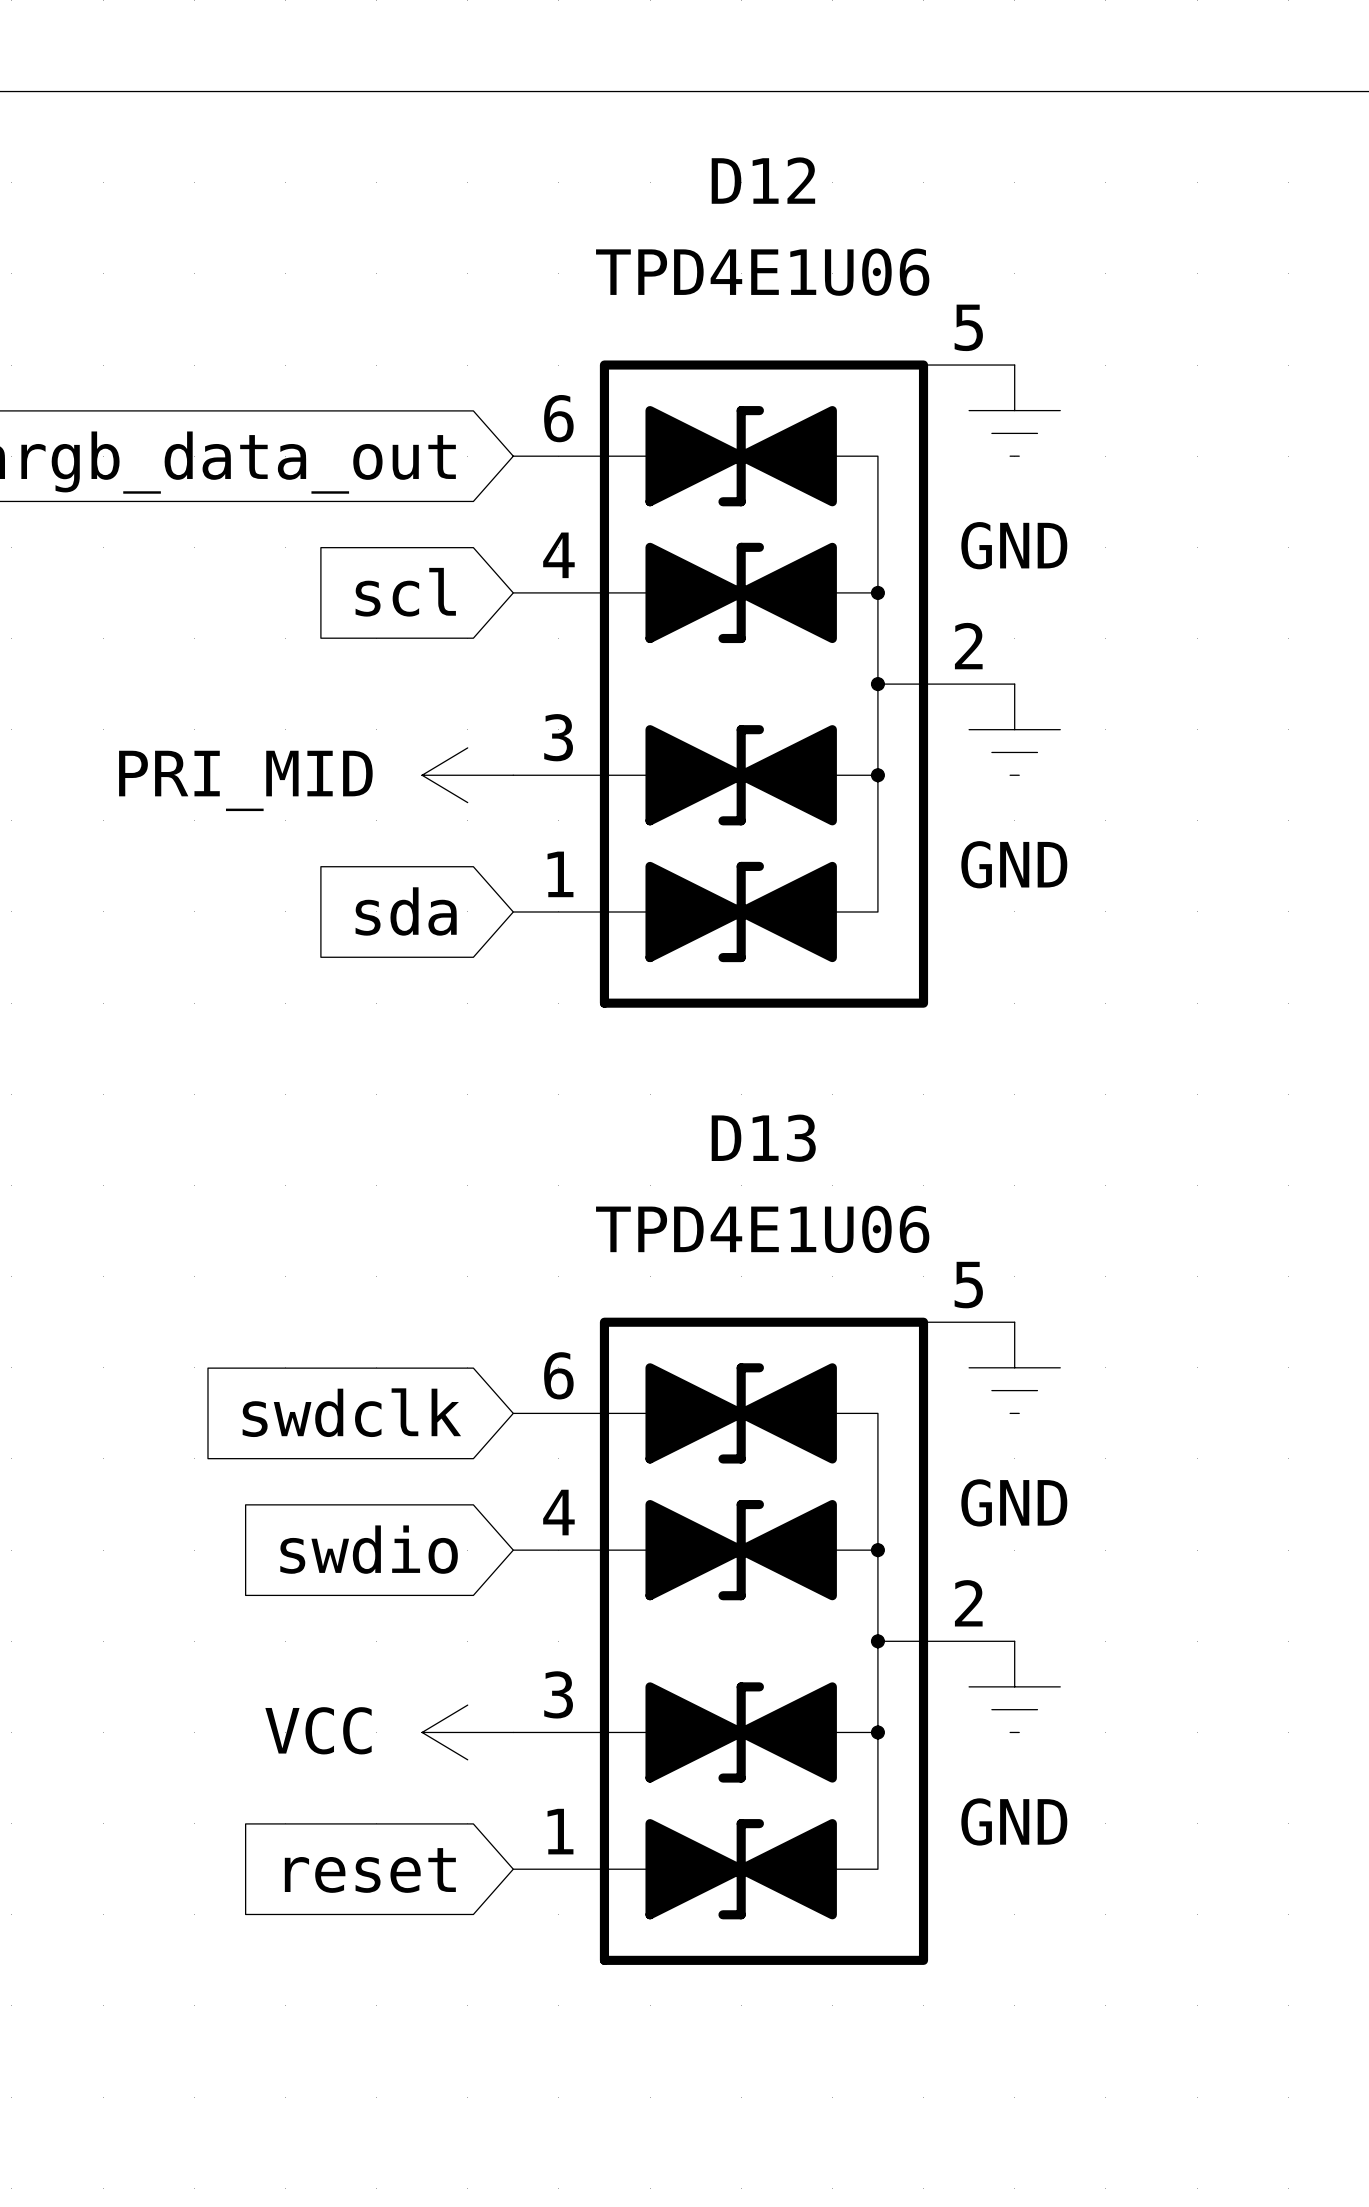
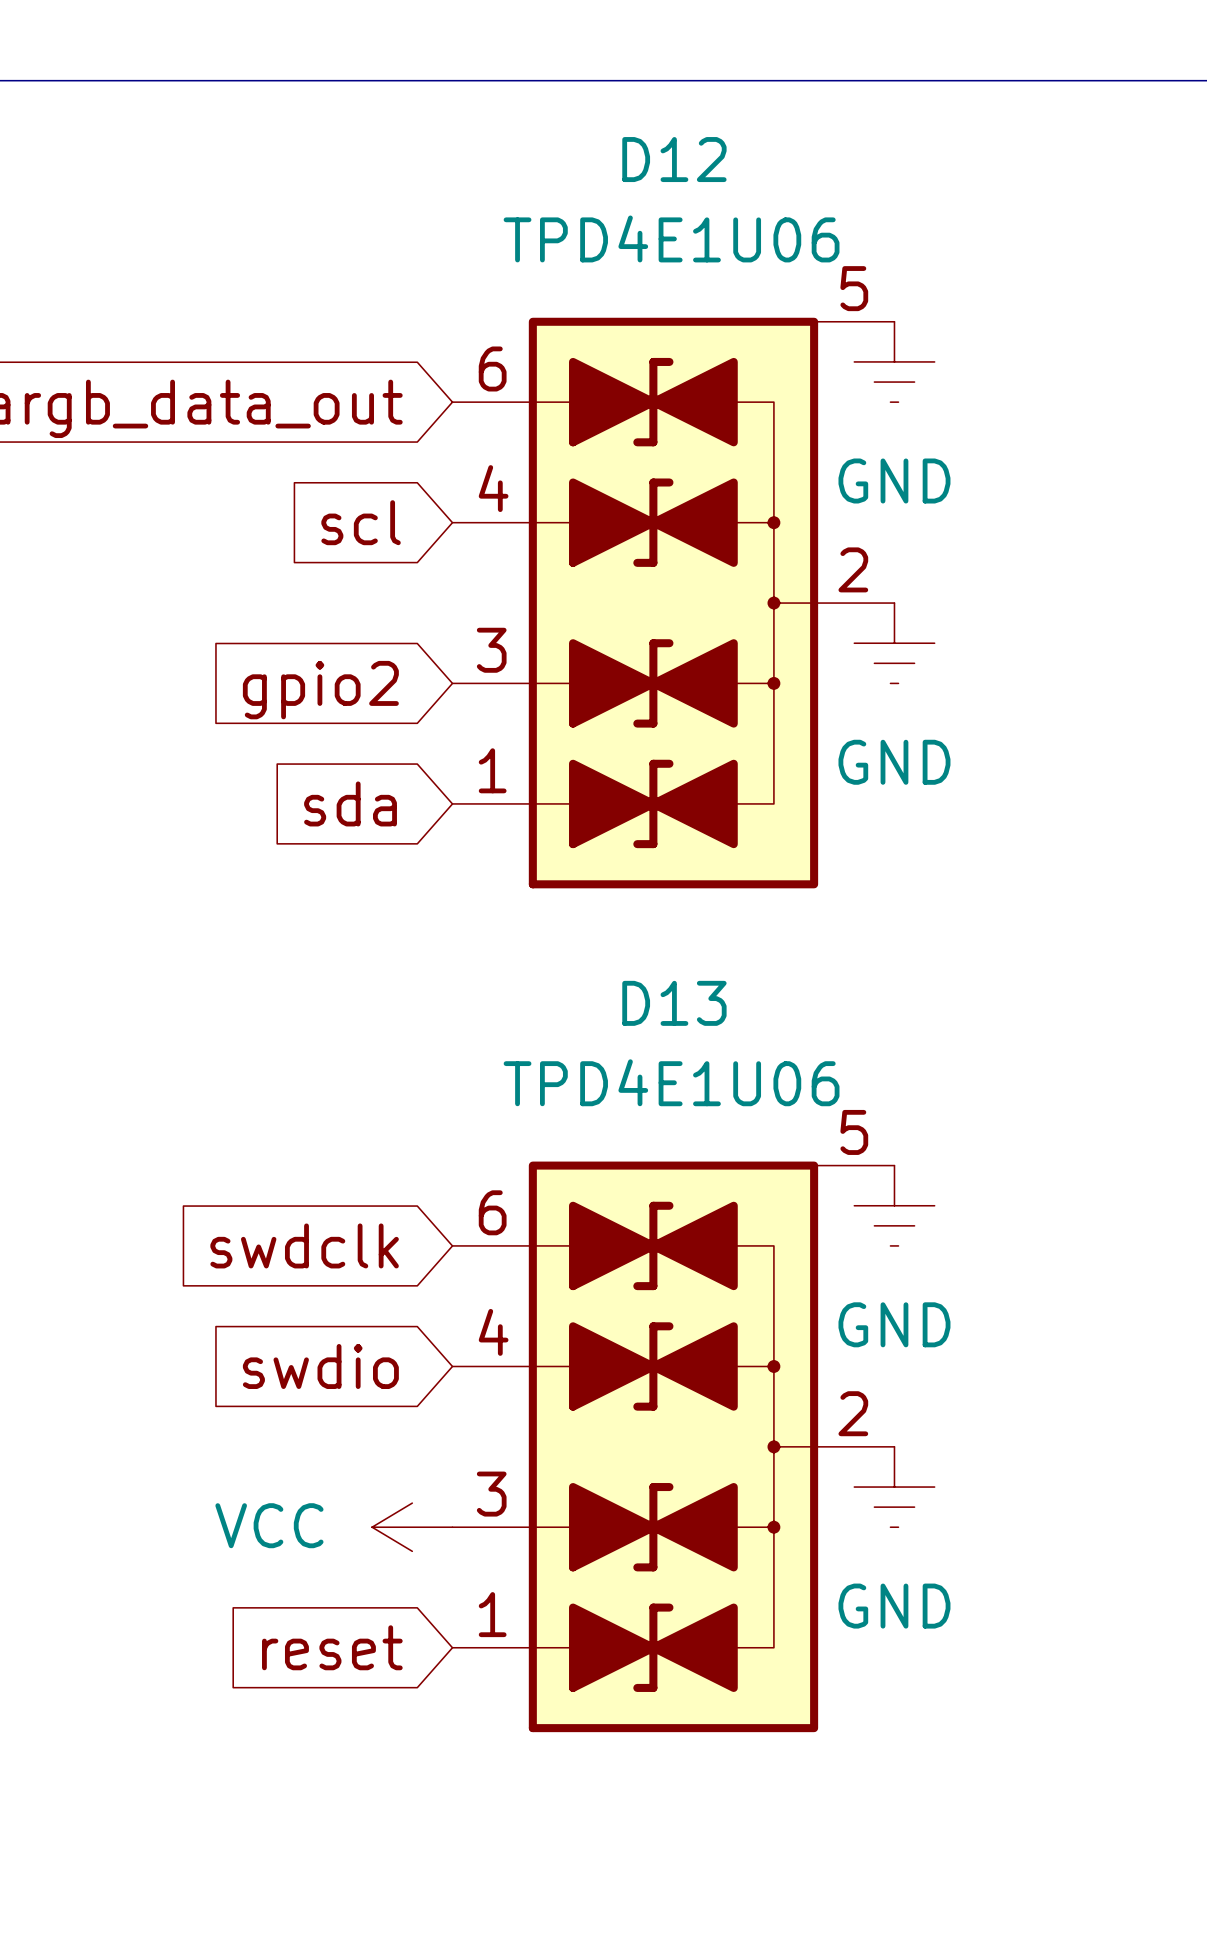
power symbol: PRI_MID (467, 775) -> none
global label: none -> gpio2 (320, 690)

